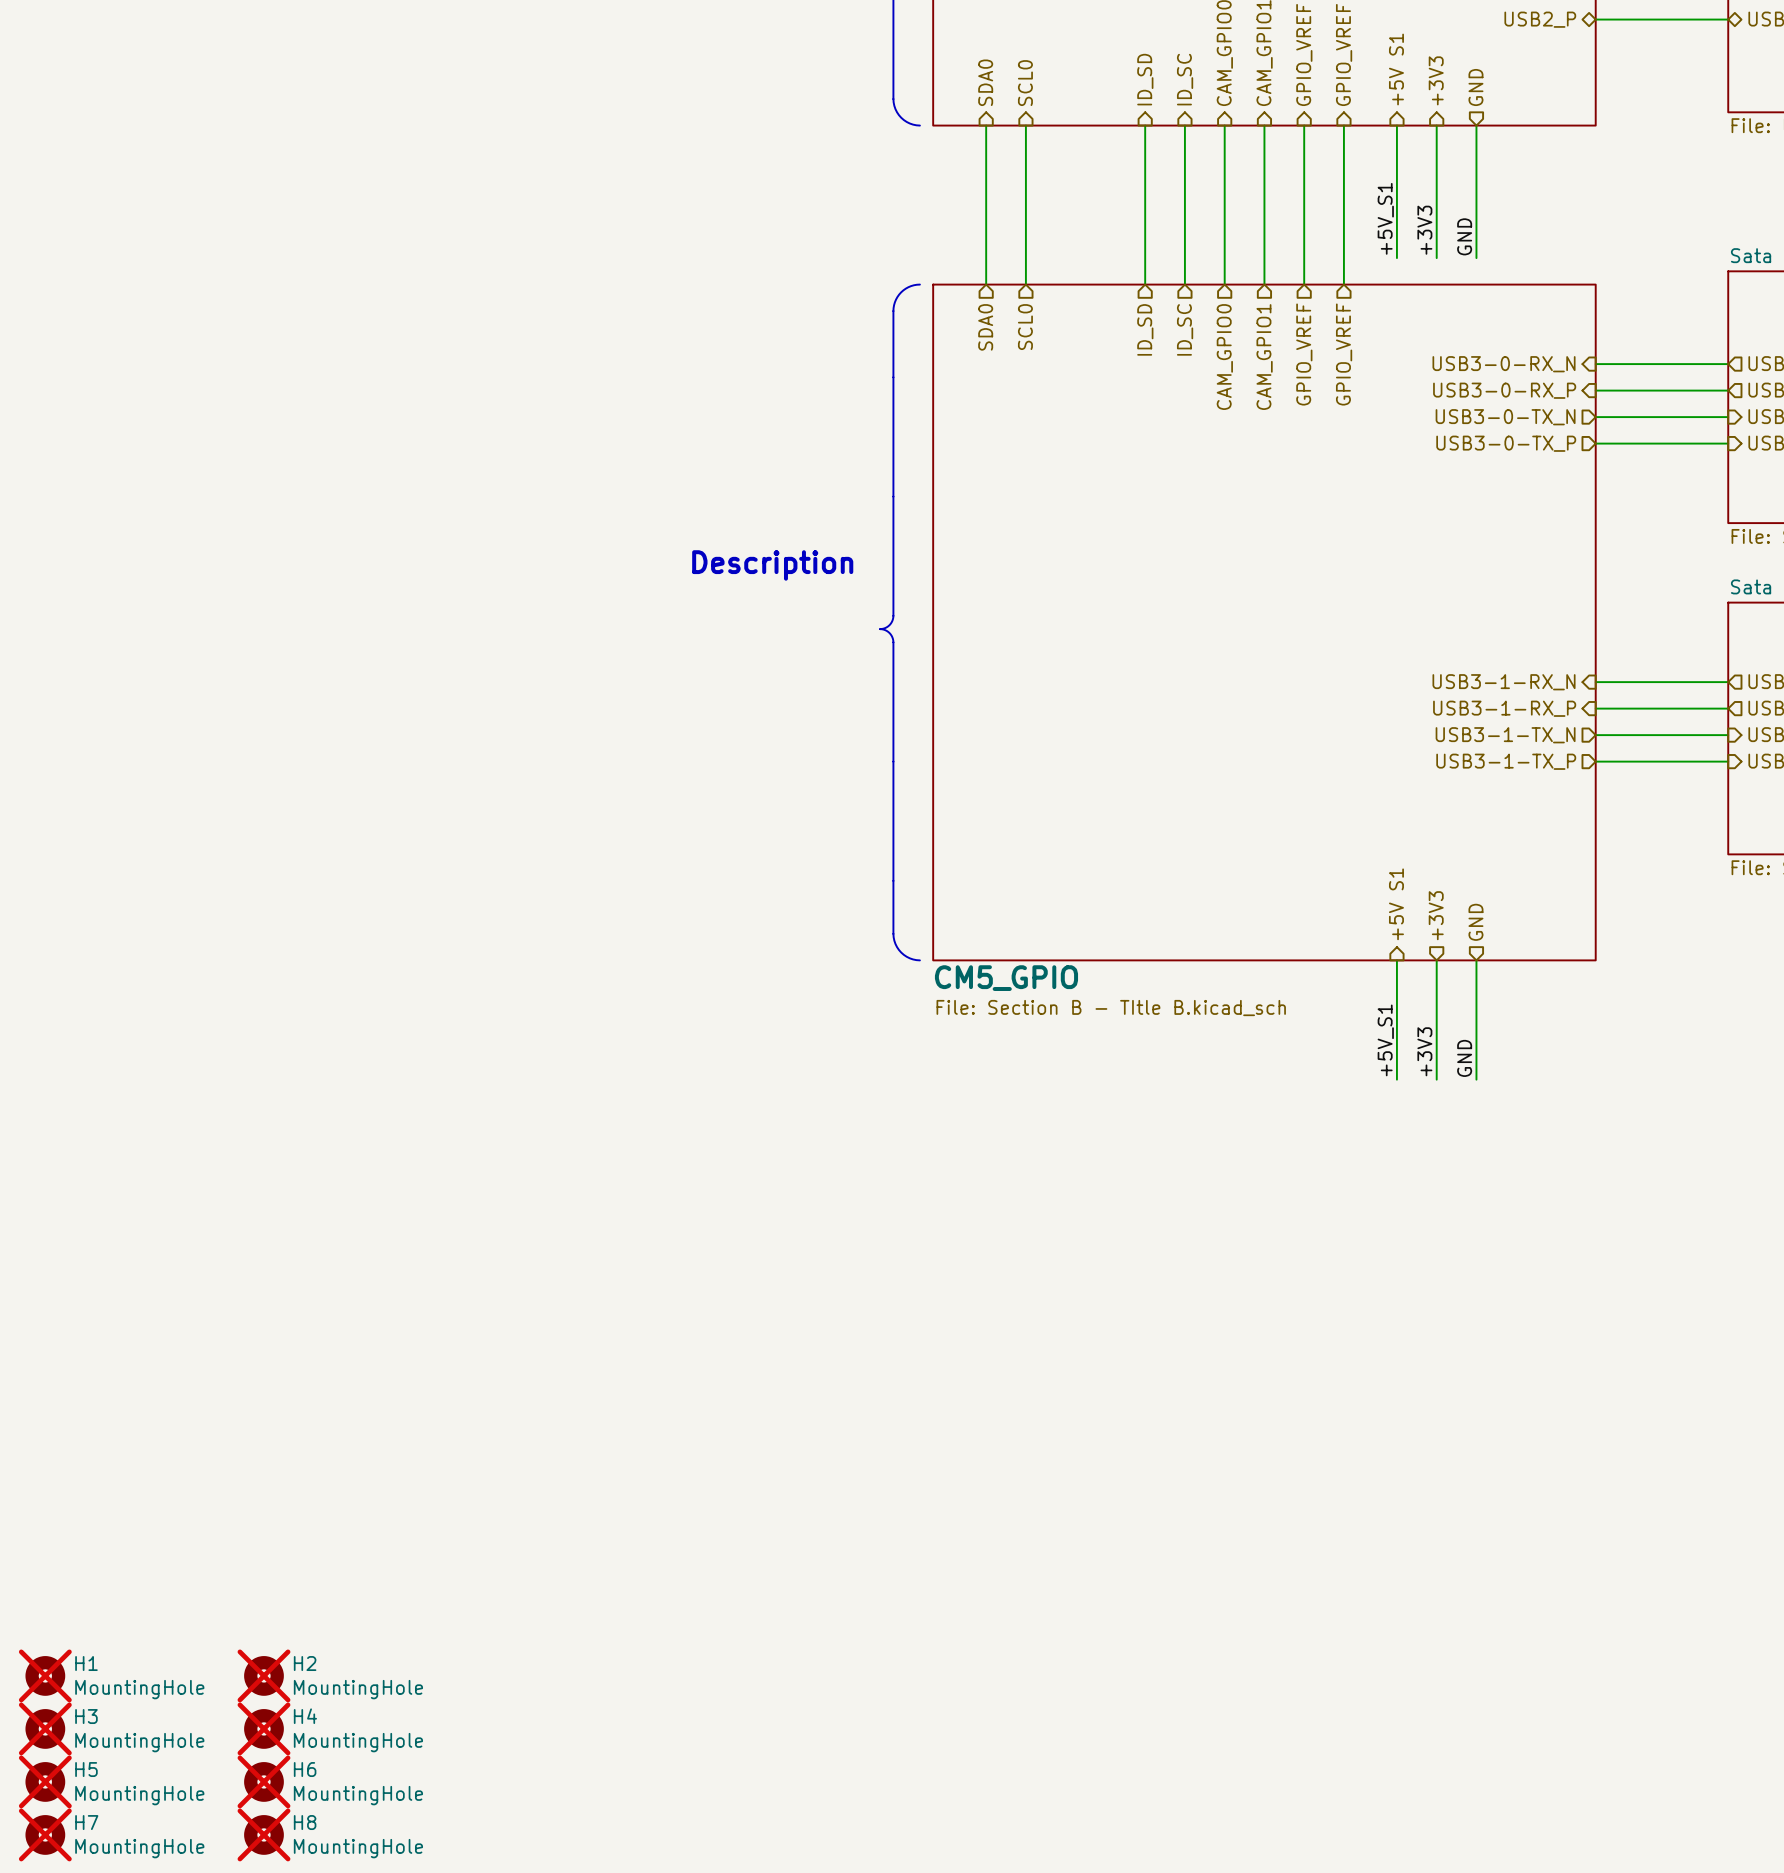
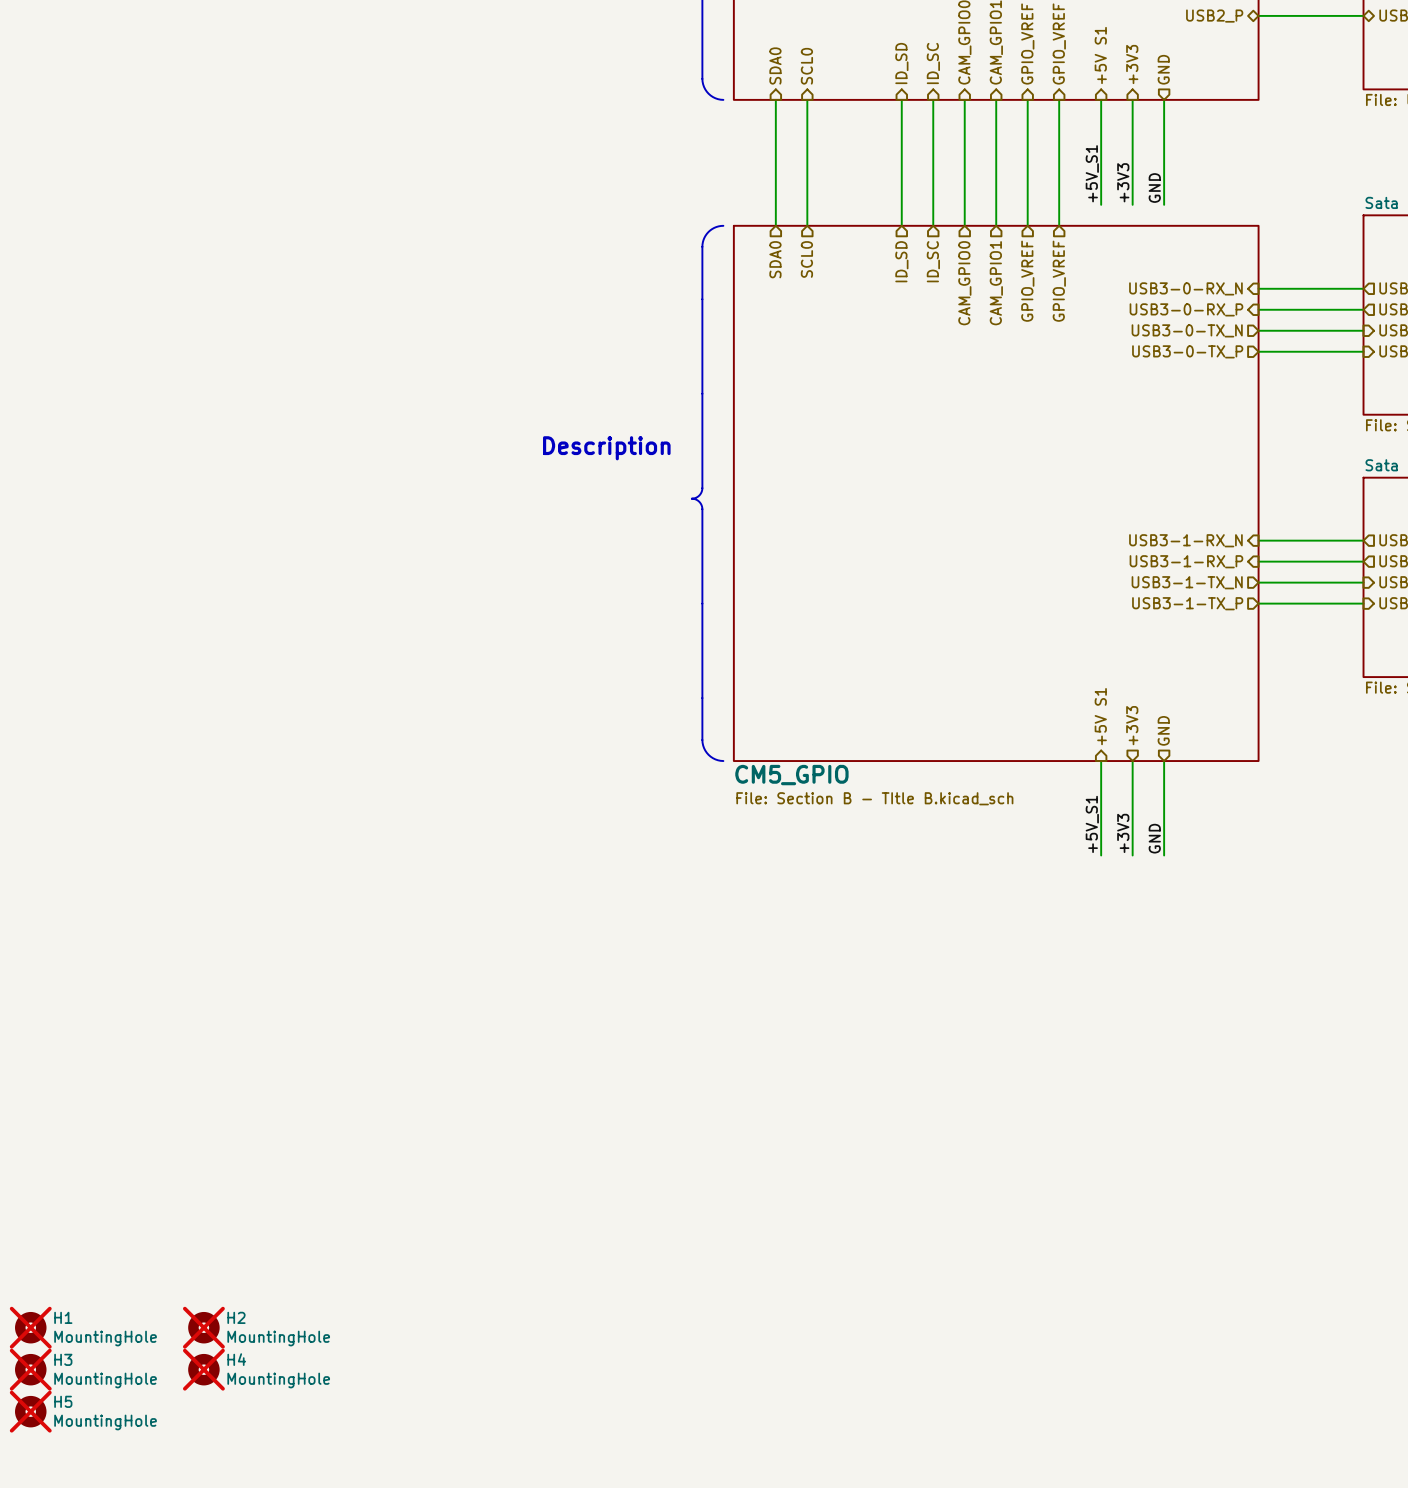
H6: MountingHole (263, 1781) -> none
H7: MountingHole (45, 1834) -> none
H8: MountingHole (263, 1834) -> none

